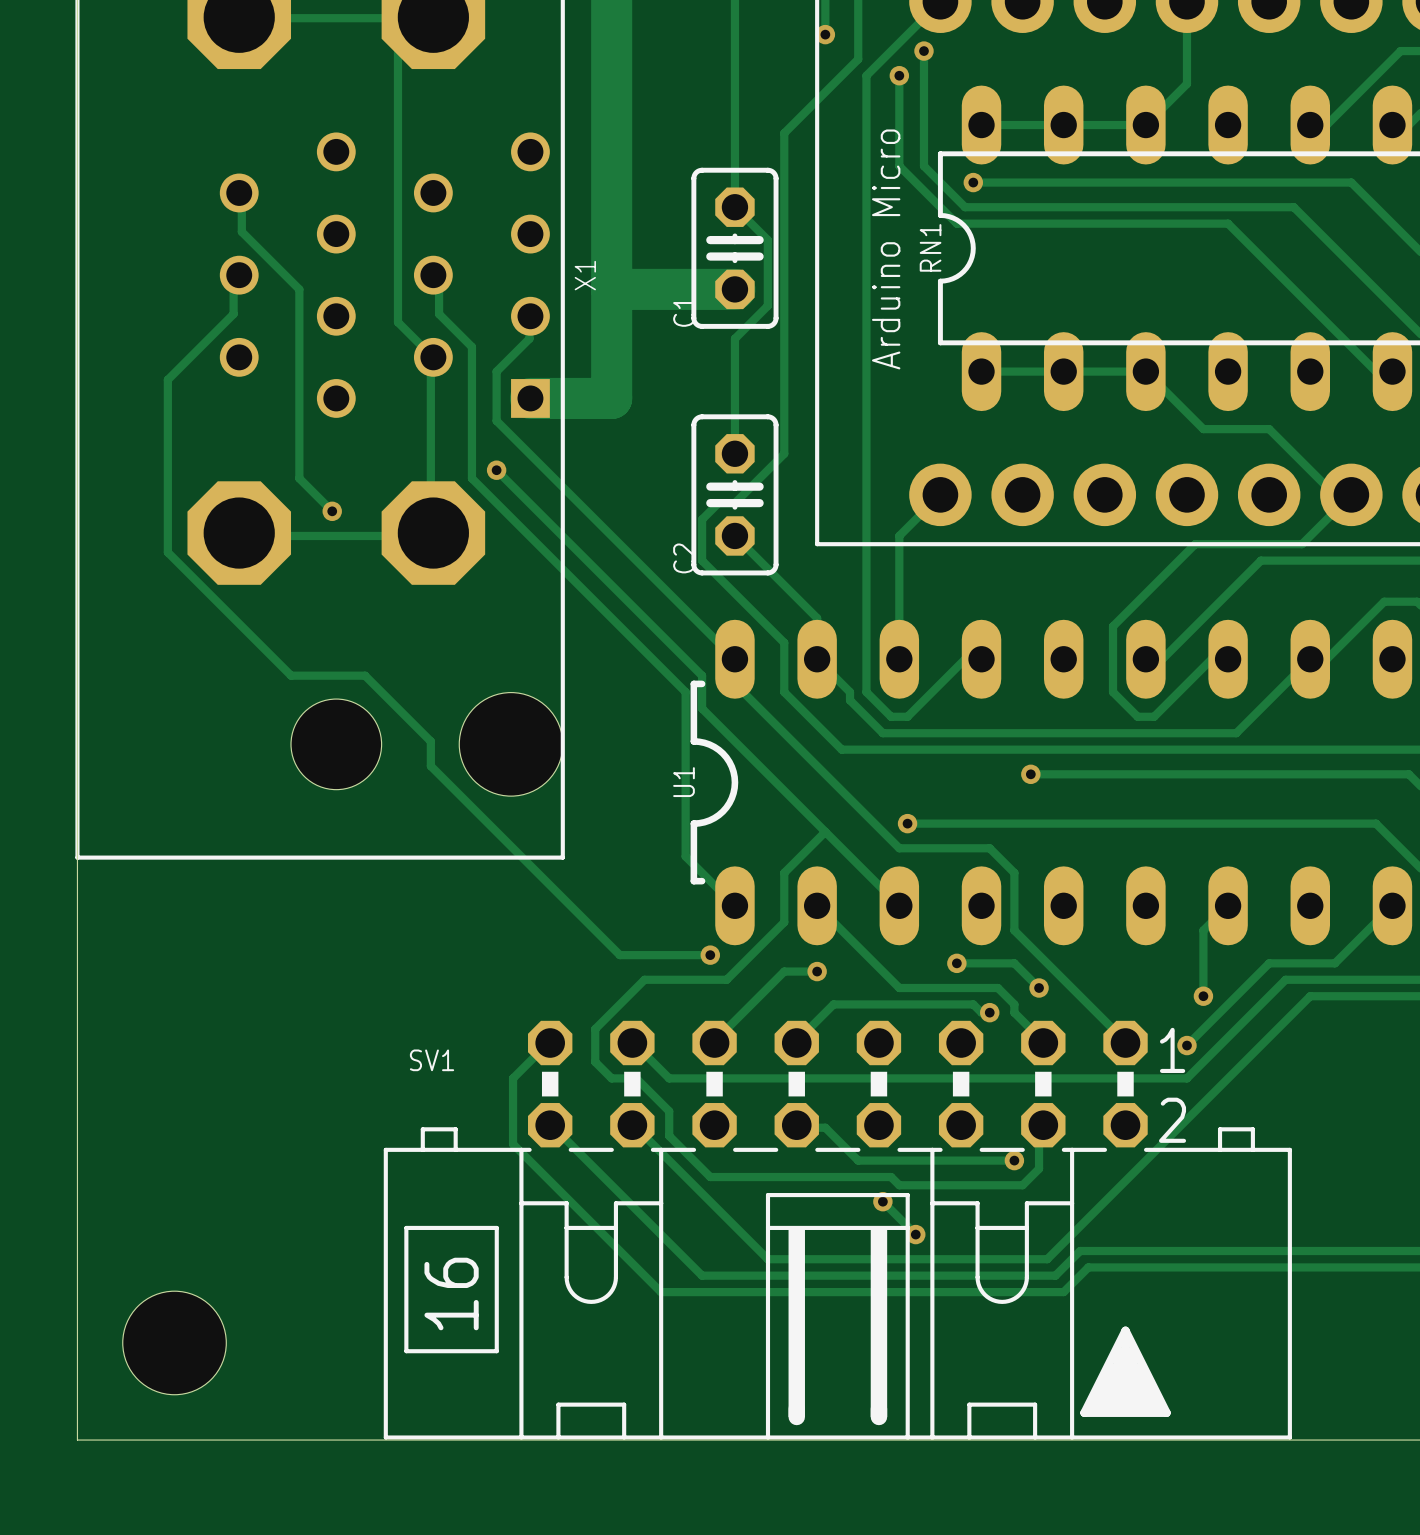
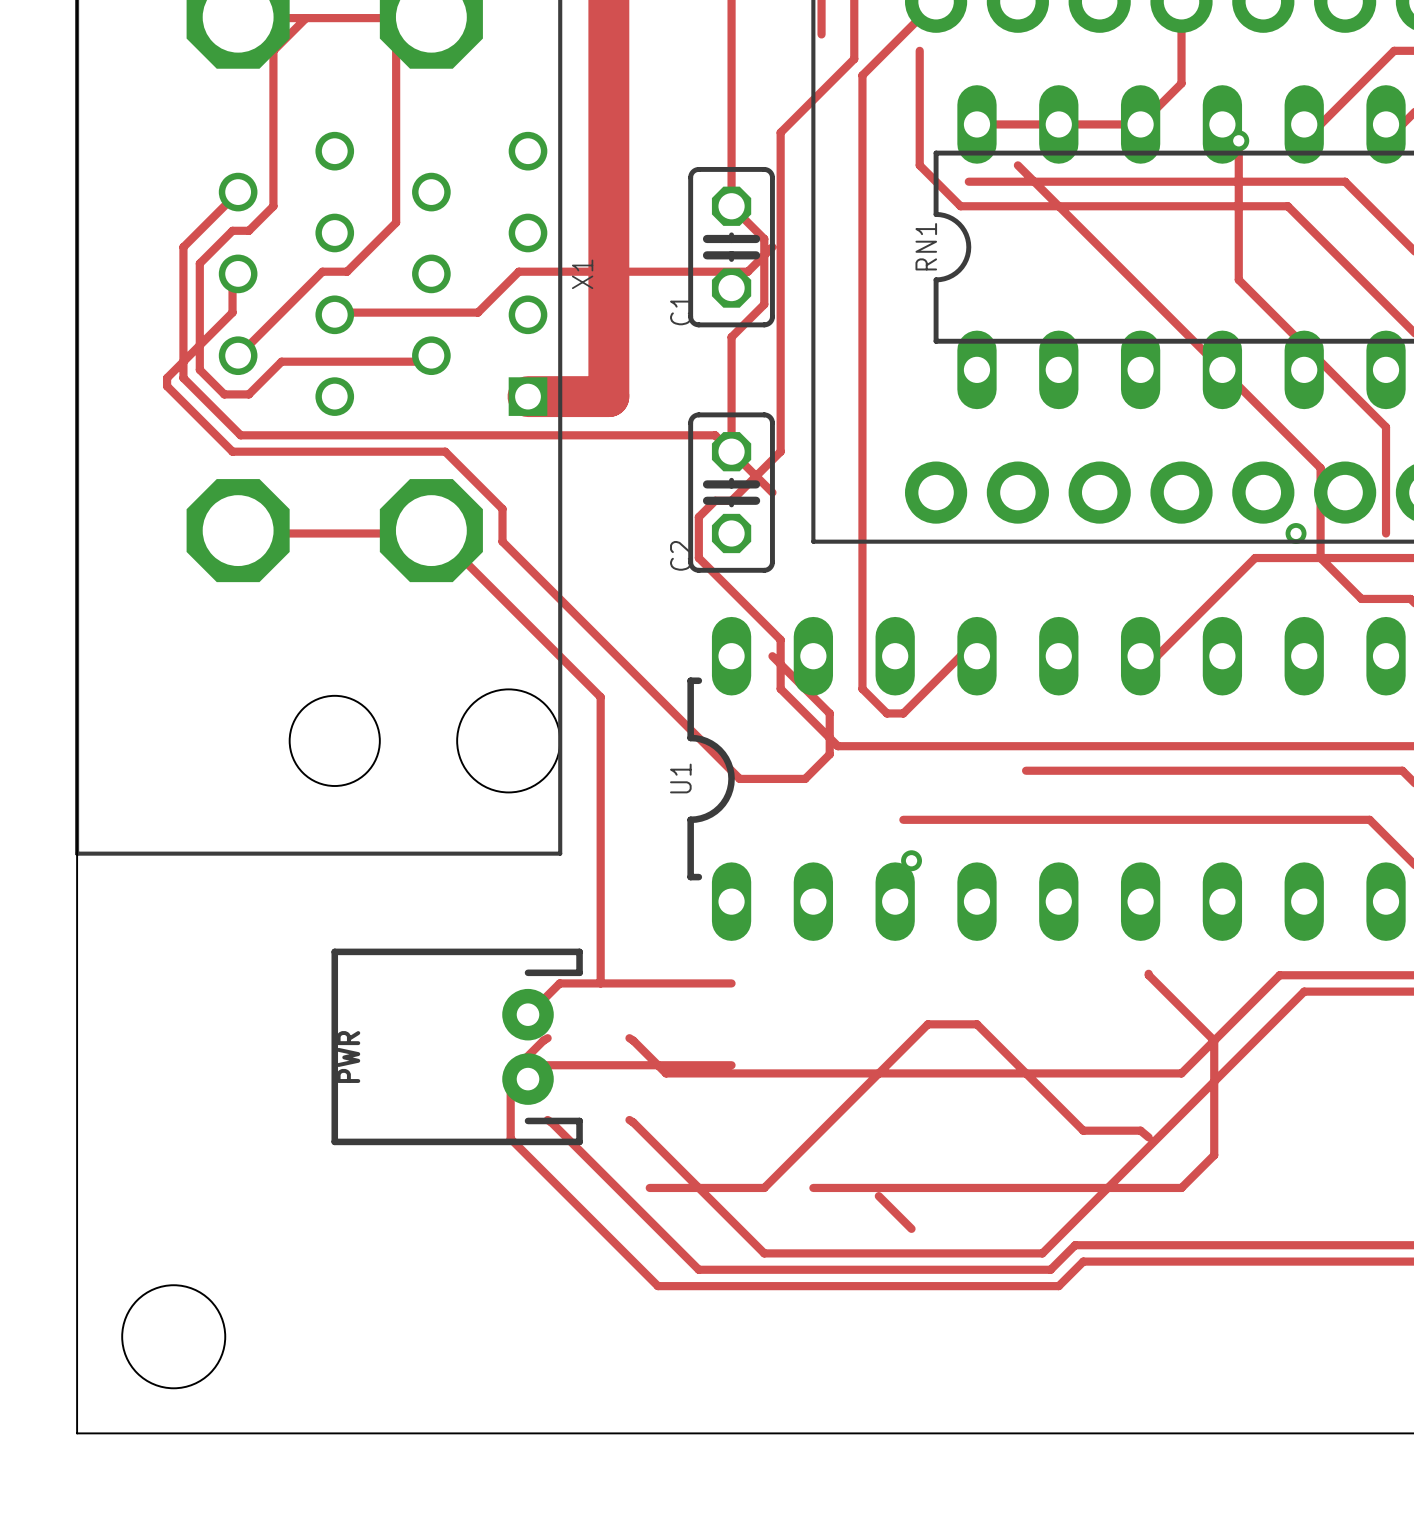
track: none -> (306, 18) (273, 50)
via: (825, 34) -> none
via: (923, 51) -> none
track: (899, 75) (899, 166) (956, 223) (1228, 223) (1376, 371) (1392, 371) -> none
via: (899, 75) -> none
track: none -> (1238, 140) (1238, 279) (1386, 427) (1386, 533)
via: none -> (1238, 140)
via: (973, 182) -> none
track: (239, 192) (241, 199) (241, 231) (299, 289) (299, 478) (332, 511) -> (238, 192) (183, 247) (183, 378) (240, 435) (715, 435) (772, 492)
track: (397, 223) (397, 322) (433, 357) -> (396, 222) (347, 271) (322, 271) (238, 355)
track: none -> (772, 247) (747, 271) (518, 271) (477, 312) (338, 312) (334, 314)
text: Arduino Micro (886, 249) -> none
track: (433, 275) (439, 281) (439, 314) (471, 346) (471, 478) -> (167, 386) (232, 451) (445, 451) (469, 476)
track: (611, 289) (734, 289) -> none
track: (530, 316) (529, 338) (496, 371) (496, 420) (734, 659) (734, 683) (899, 848) (989, 848) (1014, 872) (1014, 930) (1125, 1043) -> none
track: (430, 363) (430, 527) -> (428, 361) (281, 361) (248, 394) (224, 394) (199, 369) (199, 263) (232, 230) (248, 230) (273, 206) (273, 50)
track: (981, 371) (1145, 371) (1203, 429) (1269, 429) (1343, 503) -> none
track: (167, 388) (167, 552) (291, 675) (365, 675) (430, 741) (430, 766) (619, 955) (710, 955) -> none
track: (496, 470) (702, 675) (702, 708) (899, 905) -> none
via: (496, 470) -> none
track: (940, 494) (899, 535) (899, 659) -> none
track: (1351, 494) (1302, 544) (1195, 544) (1113, 626) (1113, 692) (1137, 716) (1154, 716) (1211, 659) (1228, 659) -> none
via: (332, 511) -> none
track: (504, 511) (685, 692) (685, 856) (734, 905) -> (502, 508) (502, 541) (739, 778) (805, 778) (829, 754) (829, 713) (772, 656)
track: none -> (431, 530) (437, 533) (600, 697) (600, 983)
track: (734, 535) (817, 618) (817, 659) (850, 692) (850, 700) (882, 733) (1236, 733) (1310, 659) (1326, 659) (1384, 601) -> (1017, 165) (1320, 468) (1320, 558) (1361, 598) (1377, 598)
via: none -> (1296, 533)
via: (1030, 774) -> none
via: (907, 823) -> none
track: (825, 831) (784, 872) (784, 922) (726, 979) (644, 979) (595, 1029) (595, 1061) (611, 1078) (636, 1078) (669, 1111) (669, 1135) (710, 1177) (891, 1177) (899, 1185) (1022, 1185) (1039, 1168) (1039, 1127) (1043, 1125) -> none
via: none -> (911, 860)
track: (817, 905) (899, 988) (997, 988) (1014, 1004) (1014, 1012) (1043, 1043) -> none
track: (1228, 905) (1203, 930) (1203, 996) -> none
track: (1392, 905) (1334, 963) (1269, 963) (1186, 1045) -> none
via: (710, 955) -> none
track: (956, 963) (1014, 963) (1039, 988) -> none
via: (956, 963) -> none
track: (817, 971) (784, 971) (714, 1043) -> none
via: (817, 971) -> none
track: none -> (1148, 973) (1214, 1040) (1214, 1155) (1181, 1187) (813, 1187)
track: none -> (731, 983) (559, 983) (528, 1014)
via: (1039, 988) -> none
via: (1203, 996) -> none
track: (989, 1012) (981, 1012) (973, 1004) (833, 1004) (796, 1043) -> none
via: (989, 1012) -> none
via: (1186, 1045) -> none
PWR: none -> (457, 1046)
track: none -> (731, 1065) (543, 1065) (528, 1079)
track: (796, 1125) (800, 1127) (825, 1127) (858, 1160) (1014, 1160) -> none
track: none -> (1148, 1137) (1140, 1130) (1083, 1130) (976, 1024) (927, 1024) (764, 1187) (649, 1187)
via: (1014, 1160) -> none
via: (882, 1201) -> none
SV1: (837, 1230) -> none
via: (915, 1234) -> none

